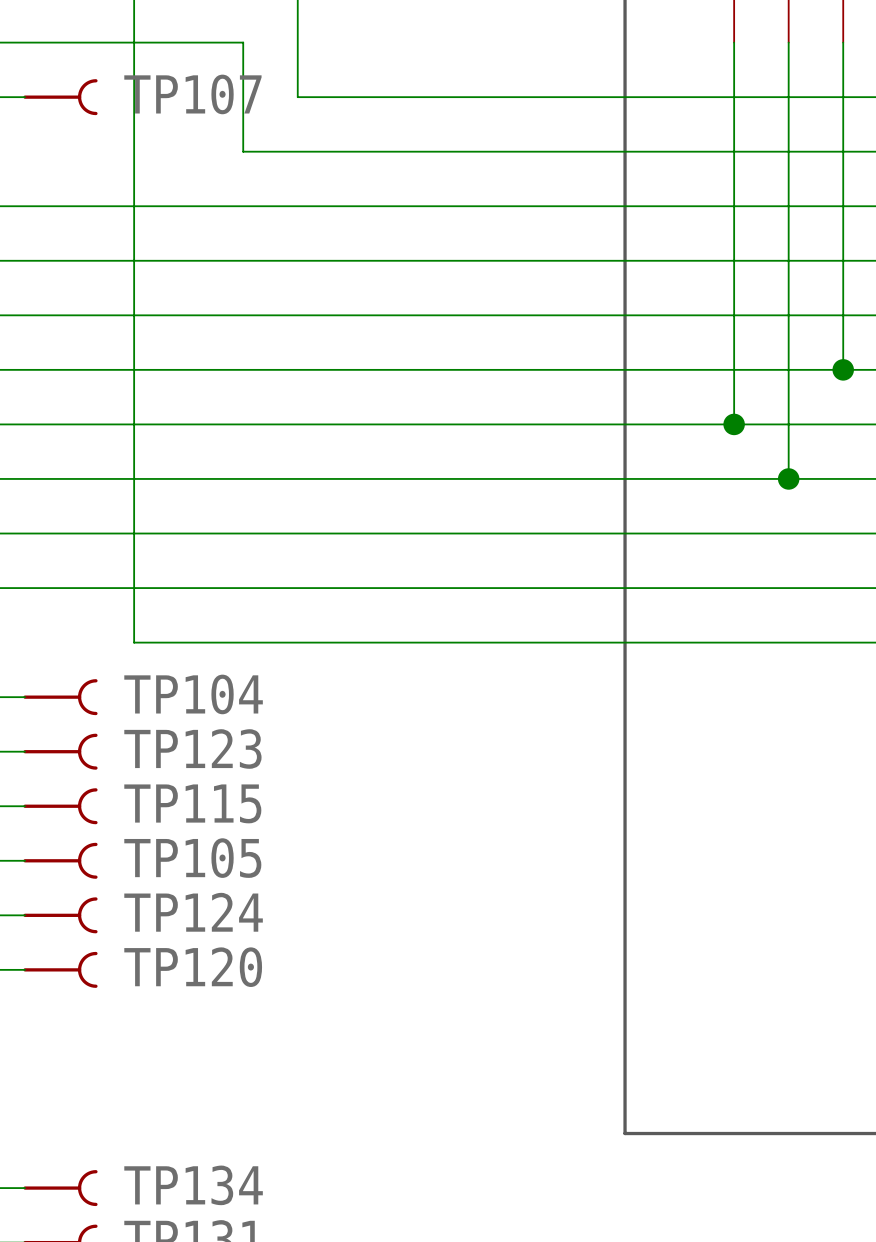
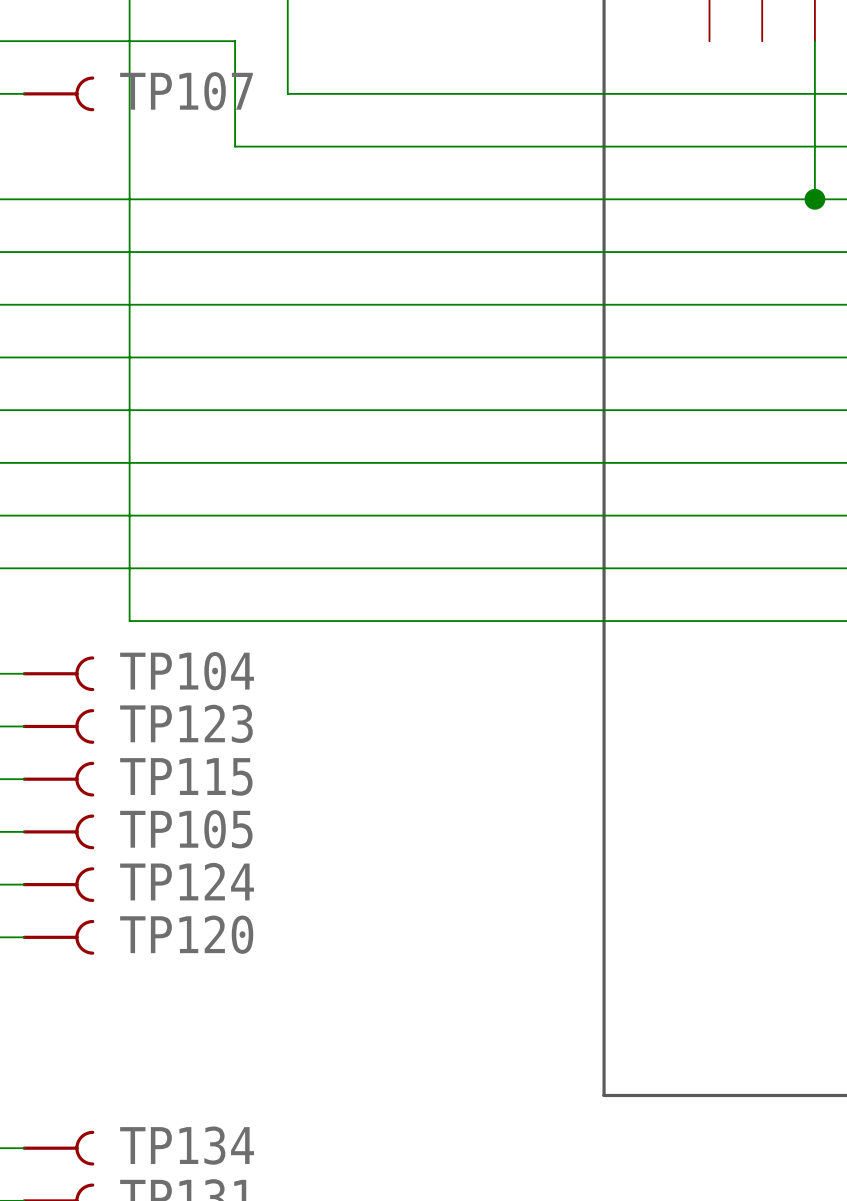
wire: (734, 42) (734, 424) -> none
wire: (788, 42) (788, 478) -> none
wire: (843, 206) (843, 369) -> none
junction: none -> (814, 199)
junction: (843, 369) -> none
junction: (734, 424) -> none
junction: (788, 478) -> none

